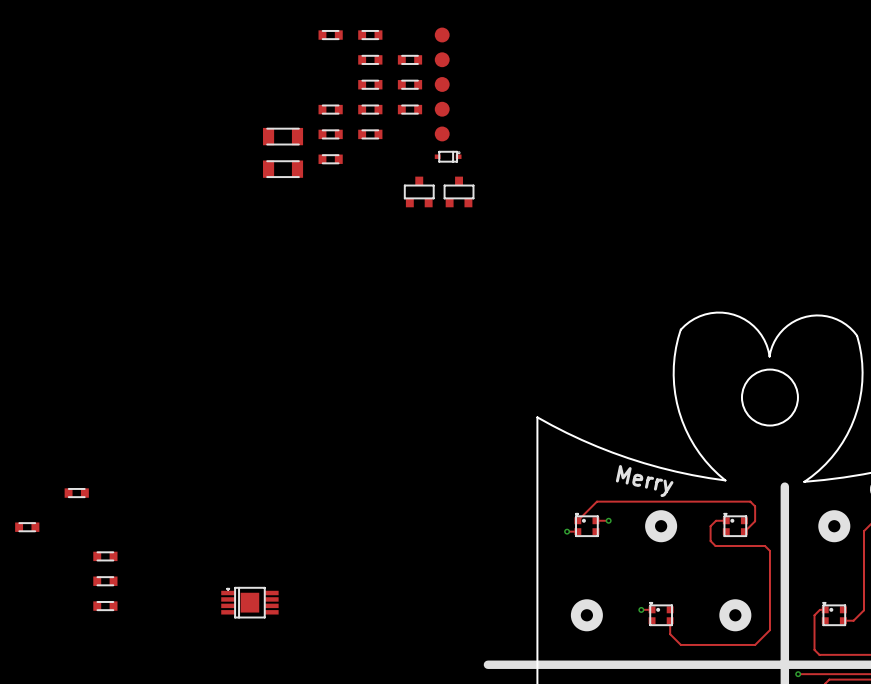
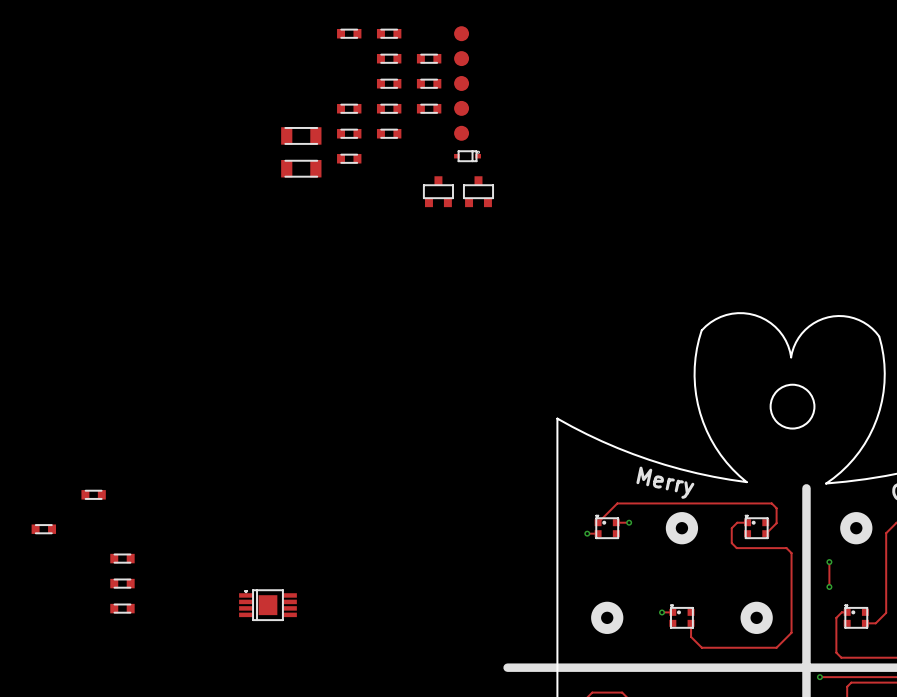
round board edge size: [741, 368, 799, 427] -> [769, 383, 816, 430]
track: none -> (829, 562) (829, 586)
via: none -> (829, 562)
via: none -> (829, 586)

